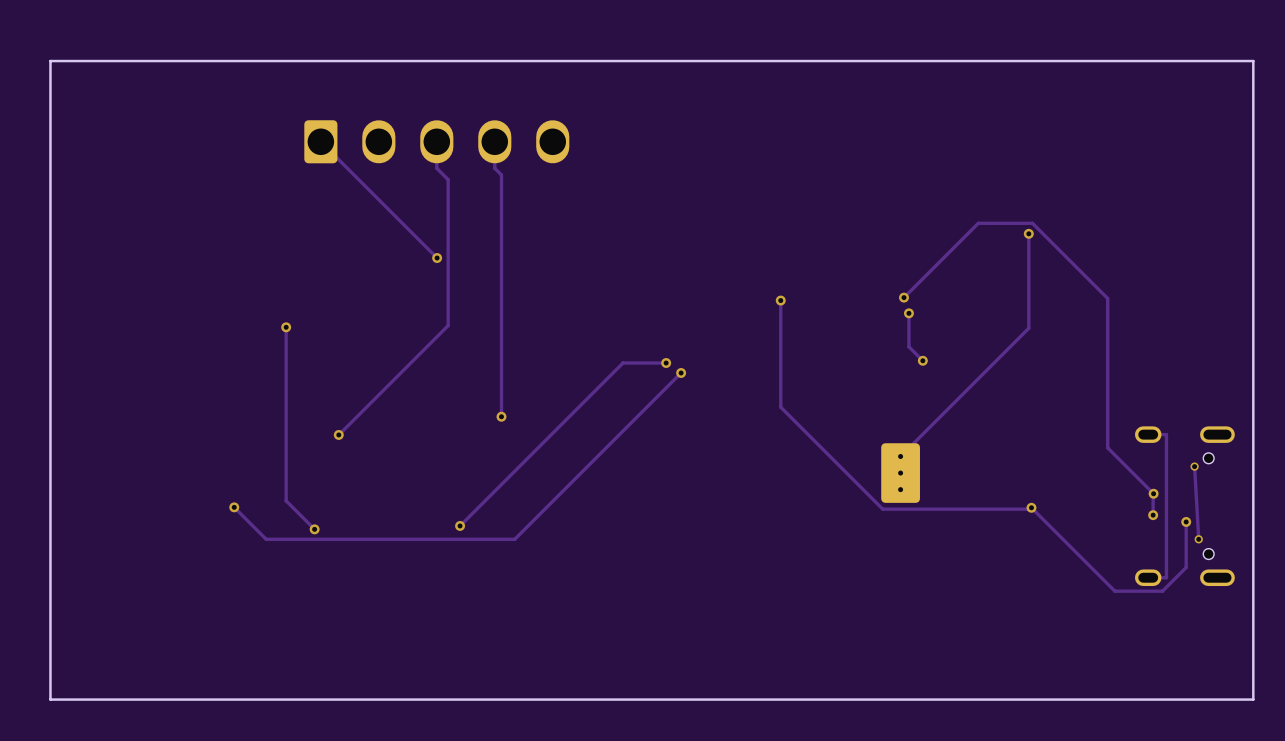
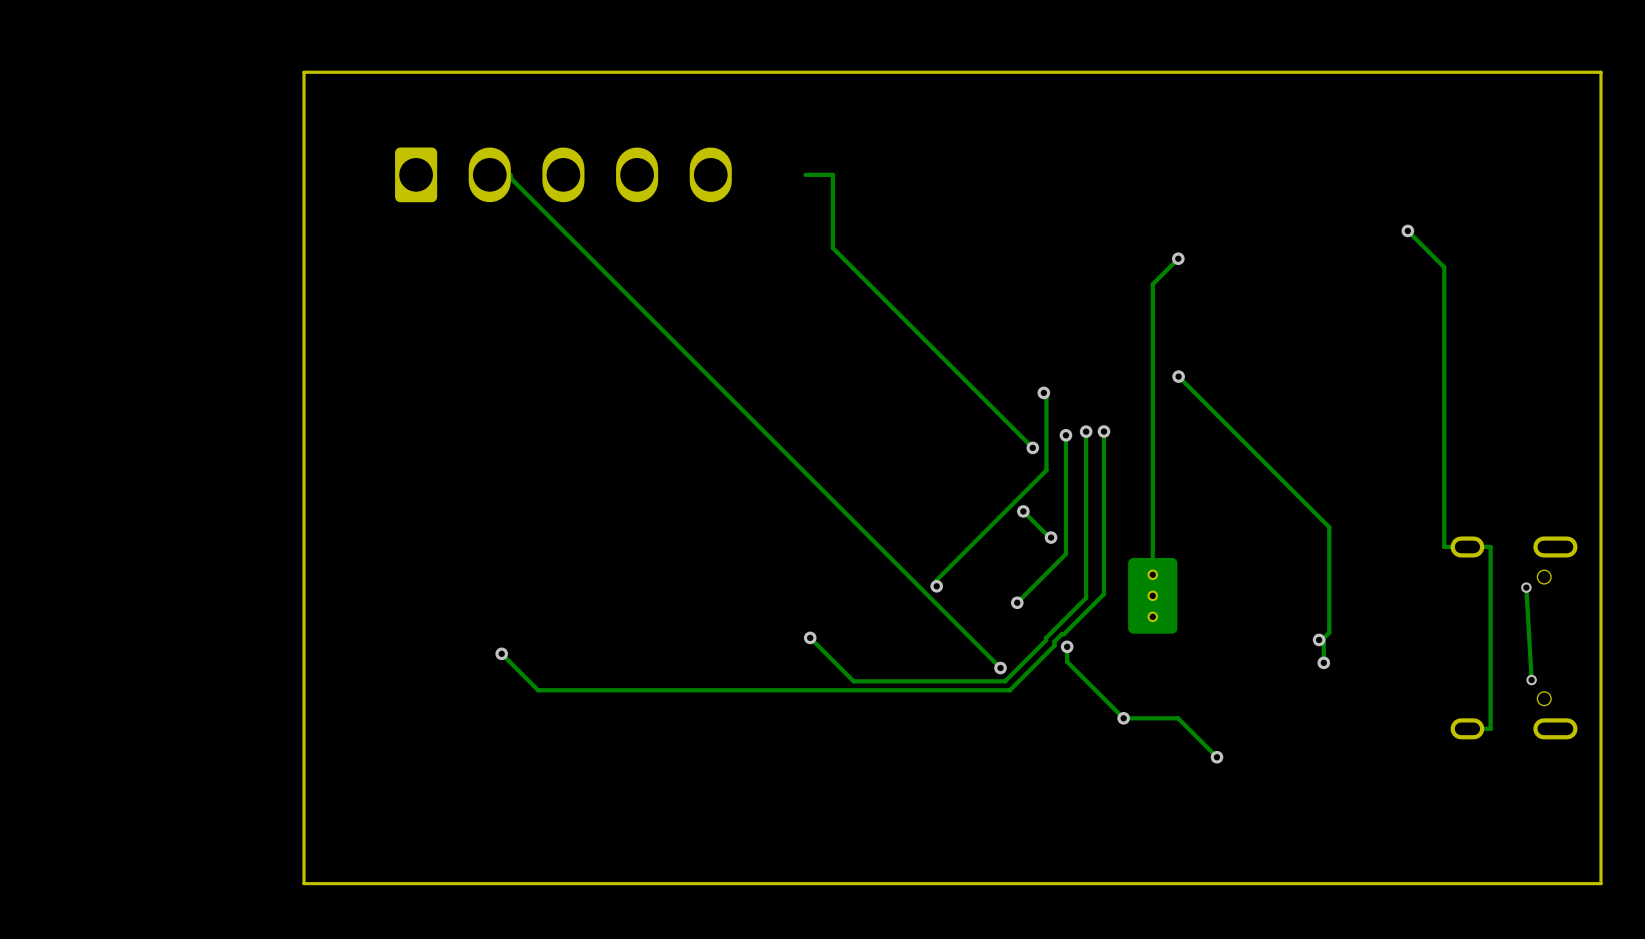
board edge: (232, 61) (50, 61) (50, 699) (232, 699) -> (304, 72) (304, 883)
track: (320, 141) (437, 258) -> none
track: none -> (510, 174) (510, 178) (1000, 668)
track: (436, 141) (436, 168) (448, 179) (448, 325) (338, 434) -> none
track: (494, 141) (494, 168) (501, 175) (501, 416) -> none
track: none -> (805, 174) (832, 174) (832, 248) (1032, 447)
track: none -> (1407, 230) (1444, 267) (1444, 546) (1467, 546)
via: none -> (1407, 230)
via: none -> (1178, 258)
track: (1028, 233) (1028, 328) (900, 456) -> (1178, 258) (1152, 284) (1152, 574)
via: (1028, 233) -> none
via: (437, 258) -> none
track: (903, 297) (978, 223) (1032, 223) (1107, 298) (1107, 447) (1153, 493) (1153, 515) -> none
via: (903, 297) -> none
track: (780, 300) (780, 407) (882, 509) (1031, 507) (1114, 591) (1162, 591) (1186, 567) (1186, 521) -> none
via: (780, 300) -> none
track: none -> (1178, 376) (1329, 527) (1329, 632) (1323, 638) (1323, 662)
via: none -> (1178, 376)
track: none -> (1043, 392) (1046, 395) (1046, 470) (936, 580) (936, 586)
via: none -> (1043, 392)
track: (908, 313) (908, 346) (922, 360) -> none
via: (908, 313) -> none
track: (286, 327) (286, 500) (314, 529) -> none
via: (286, 327) -> none
track: none -> (1086, 431) (1086, 597) (1005, 681) (853, 681) (810, 637)
via: none -> (1086, 431)
track: none -> (1103, 431) (1103, 594) (1054, 641) (1054, 645) (1009, 690) (538, 690) (501, 653)
via: none -> (1103, 431)
track: none -> (1065, 435) (1065, 554) (1017, 602)
via: none -> (1065, 435)
via: none -> (1032, 447)
via: (922, 360) -> none
track: (666, 363) (623, 363) (460, 525) -> none
via: (666, 363) -> none
track: (681, 372) (514, 539) (266, 539) (234, 507) -> none
via: (681, 372) -> none
track: none -> (1023, 511) (1051, 537)
via: none -> (1023, 511)
via: (501, 416) -> none
via: none -> (1051, 537)
via: (338, 434) -> none
via: none -> (936, 586)
via: none -> (1017, 602)
via: (1153, 493) -> none
via: none -> (810, 637)
via: (234, 507) -> none
track: none -> (1067, 646) (1067, 661) (1123, 718) (1178, 718) (1217, 757)
via: none -> (1067, 646)
via: (1153, 515) -> none
via: none -> (501, 653)
via: (1186, 521) -> none
via: (460, 525) -> none
via: none -> (1323, 662)
via: (314, 529) -> none
via: none -> (1000, 668)
via: none -> (1123, 718)
via: none -> (1217, 757)

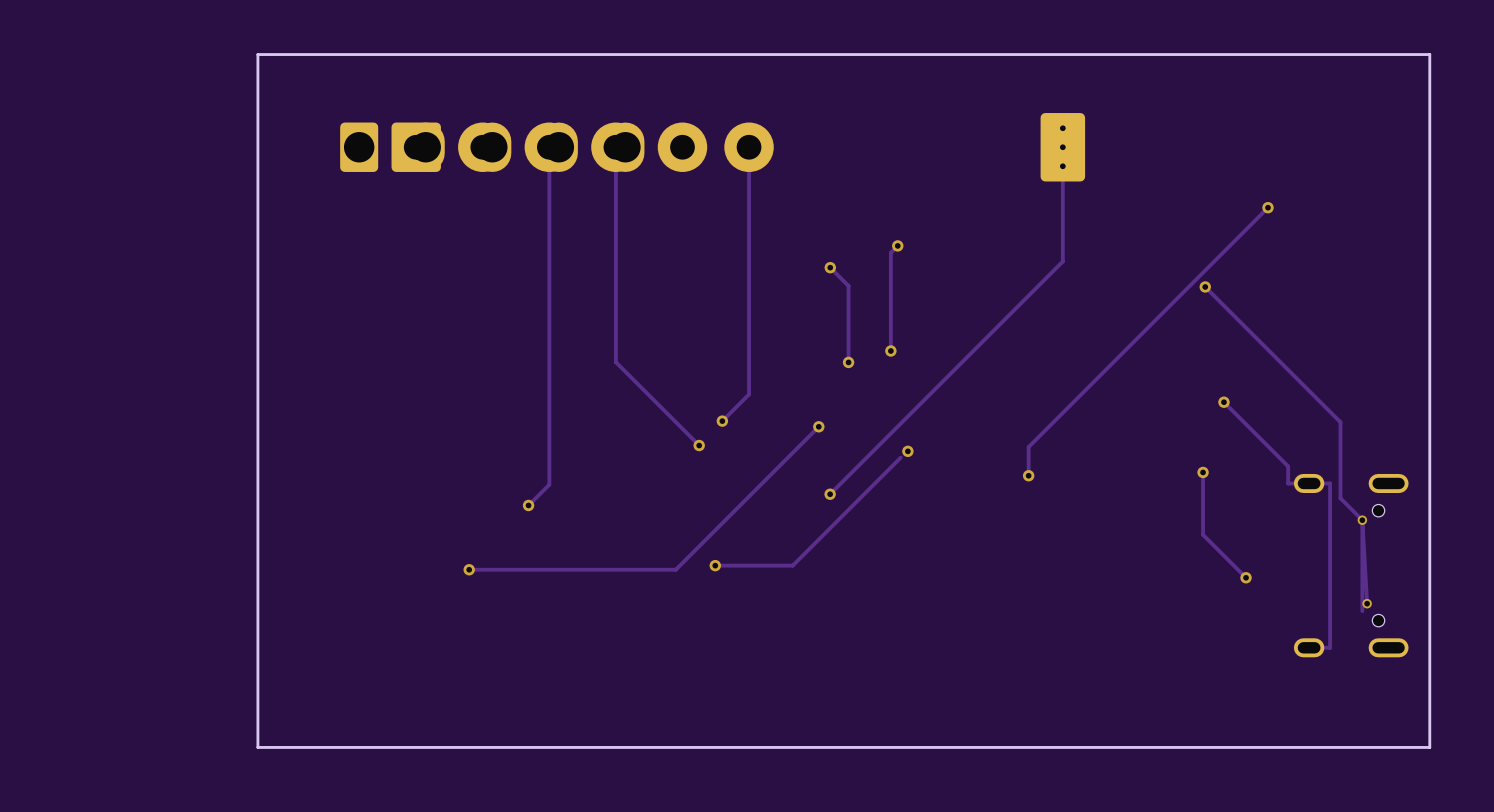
track: none -> (1062, 128) (1062, 261) (830, 494)
track: (510, 174) (510, 178) (1000, 668) -> none
track: none -> (549, 147) (549, 484) (528, 505)
part: none -> (582, 147)
track: none -> (615, 147) (615, 362) (699, 445)
track: (805, 174) (832, 174) (832, 248) (1032, 447) -> none
track: none -> (749, 147) (749, 394) (722, 421)
track: (1407, 230) (1444, 267) (1444, 528) -> (1223, 402) (1288, 466)
via position: (1407, 230) -> (1268, 207)
track: none -> (1268, 207) (1028, 447) (1028, 475)
track: (1178, 258) (1152, 284) (1152, 616) -> none
via: (1178, 258) -> none
track: none -> (897, 245) (890, 252) (890, 350)
via: none -> (897, 245)
track: none -> (830, 267) (848, 285) (848, 362)
via: none -> (830, 267)
track: none -> (1205, 286) (1340, 422) (1340, 498) (1362, 520) (1362, 611)
via: none -> (1205, 286)
track: (1178, 376) (1329, 527) (1329, 632) (1323, 638) (1323, 662) -> none
via: (1178, 376) -> none
track: (1043, 392) (1046, 395) (1046, 470) (936, 580) (936, 586) -> none
via: (1043, 392) -> none
via: none -> (890, 350)
via: none -> (848, 362)
track: (1086, 431) (1086, 597) (1005, 681) (853, 681) (810, 637) -> none
via: (1086, 431) -> none
track: (1103, 431) (1103, 594) (1054, 641) (1054, 645) (1009, 690) (538, 690) (501, 653) -> none
via: (1103, 431) -> none
track: (1065, 435) (1065, 554) (1017, 602) -> none
via: (1065, 435) -> none
via: (1032, 447) -> none
via: none -> (1223, 402)
via: none -> (722, 421)
track: none -> (818, 426) (675, 569) (469, 569)
via: none -> (818, 426)
via: none -> (699, 445)
track: (1023, 511) (1051, 537) -> none
track: none -> (900, 457) (792, 565) (716, 565)
track: none -> (1203, 472) (1203, 534) (1246, 577)
via: none -> (1203, 472)
via: (1051, 537) -> none
via: none -> (1028, 475)
via: none -> (528, 505)
via position: (936, 586) -> (830, 494)
part position: (1152, 595) -> (1062, 147)
via: (1017, 602) -> none
via: (1319, 639) -> none
track: (1067, 646) (1067, 661) (1123, 718) (1178, 718) (1217, 757) -> none
via: (1067, 646) -> none
via: none -> (1246, 577)
via position: (501, 653) -> (469, 569)
via: (1323, 662) -> none
via: (1000, 668) -> none
via: (1123, 718) -> none
via: (1217, 757) -> none
board edge: (1600, 839) (1600, 883) (304, 883) (304, 839) -> (1429, 747) (257, 747)

